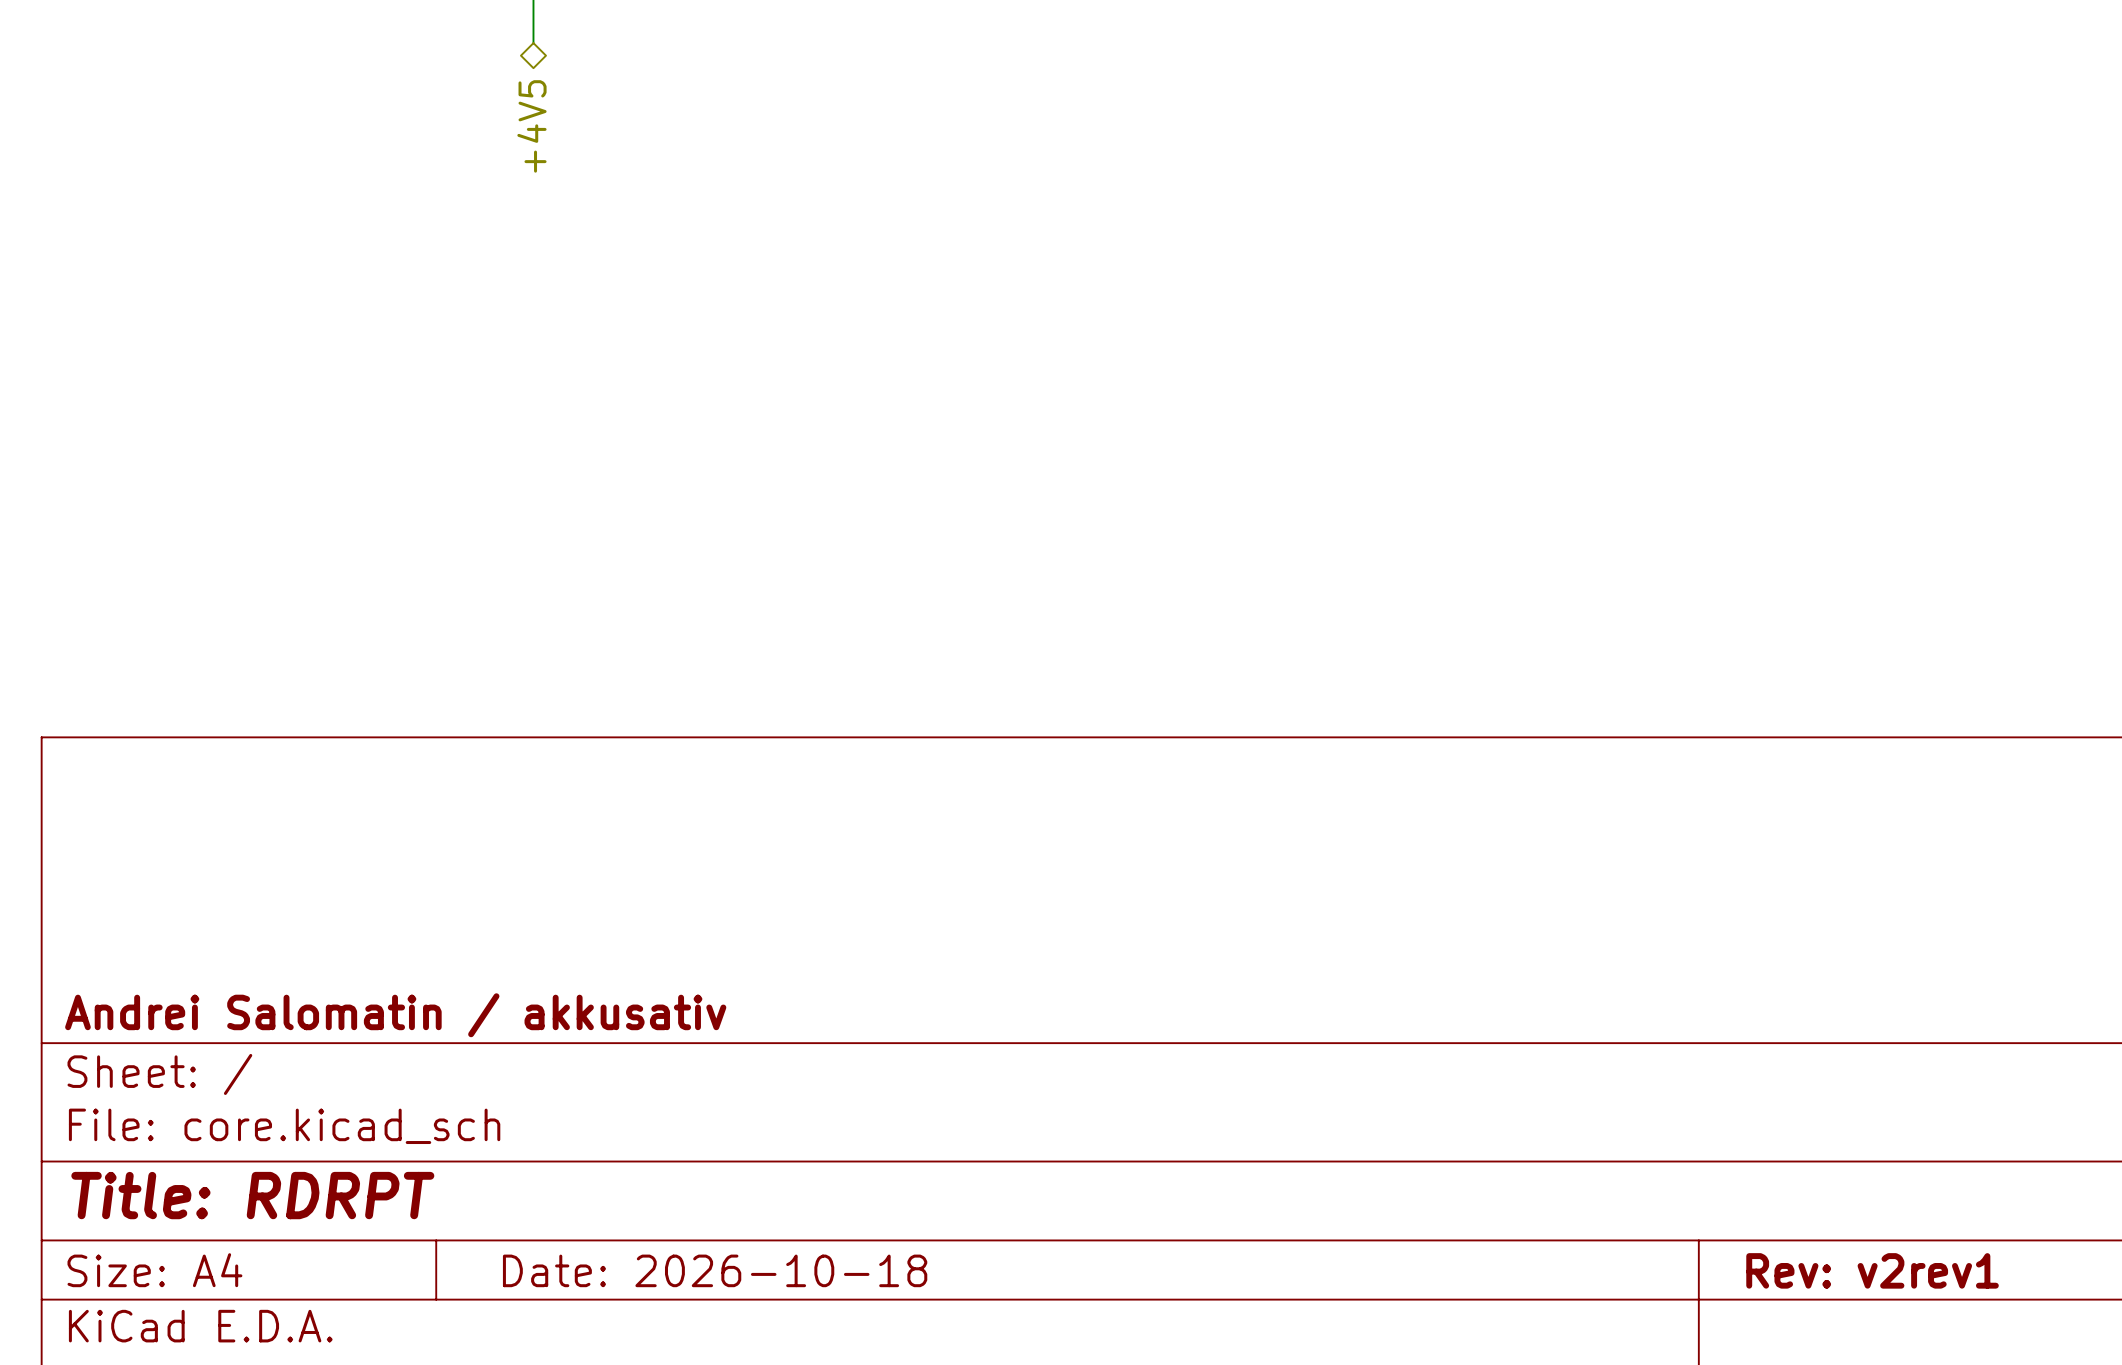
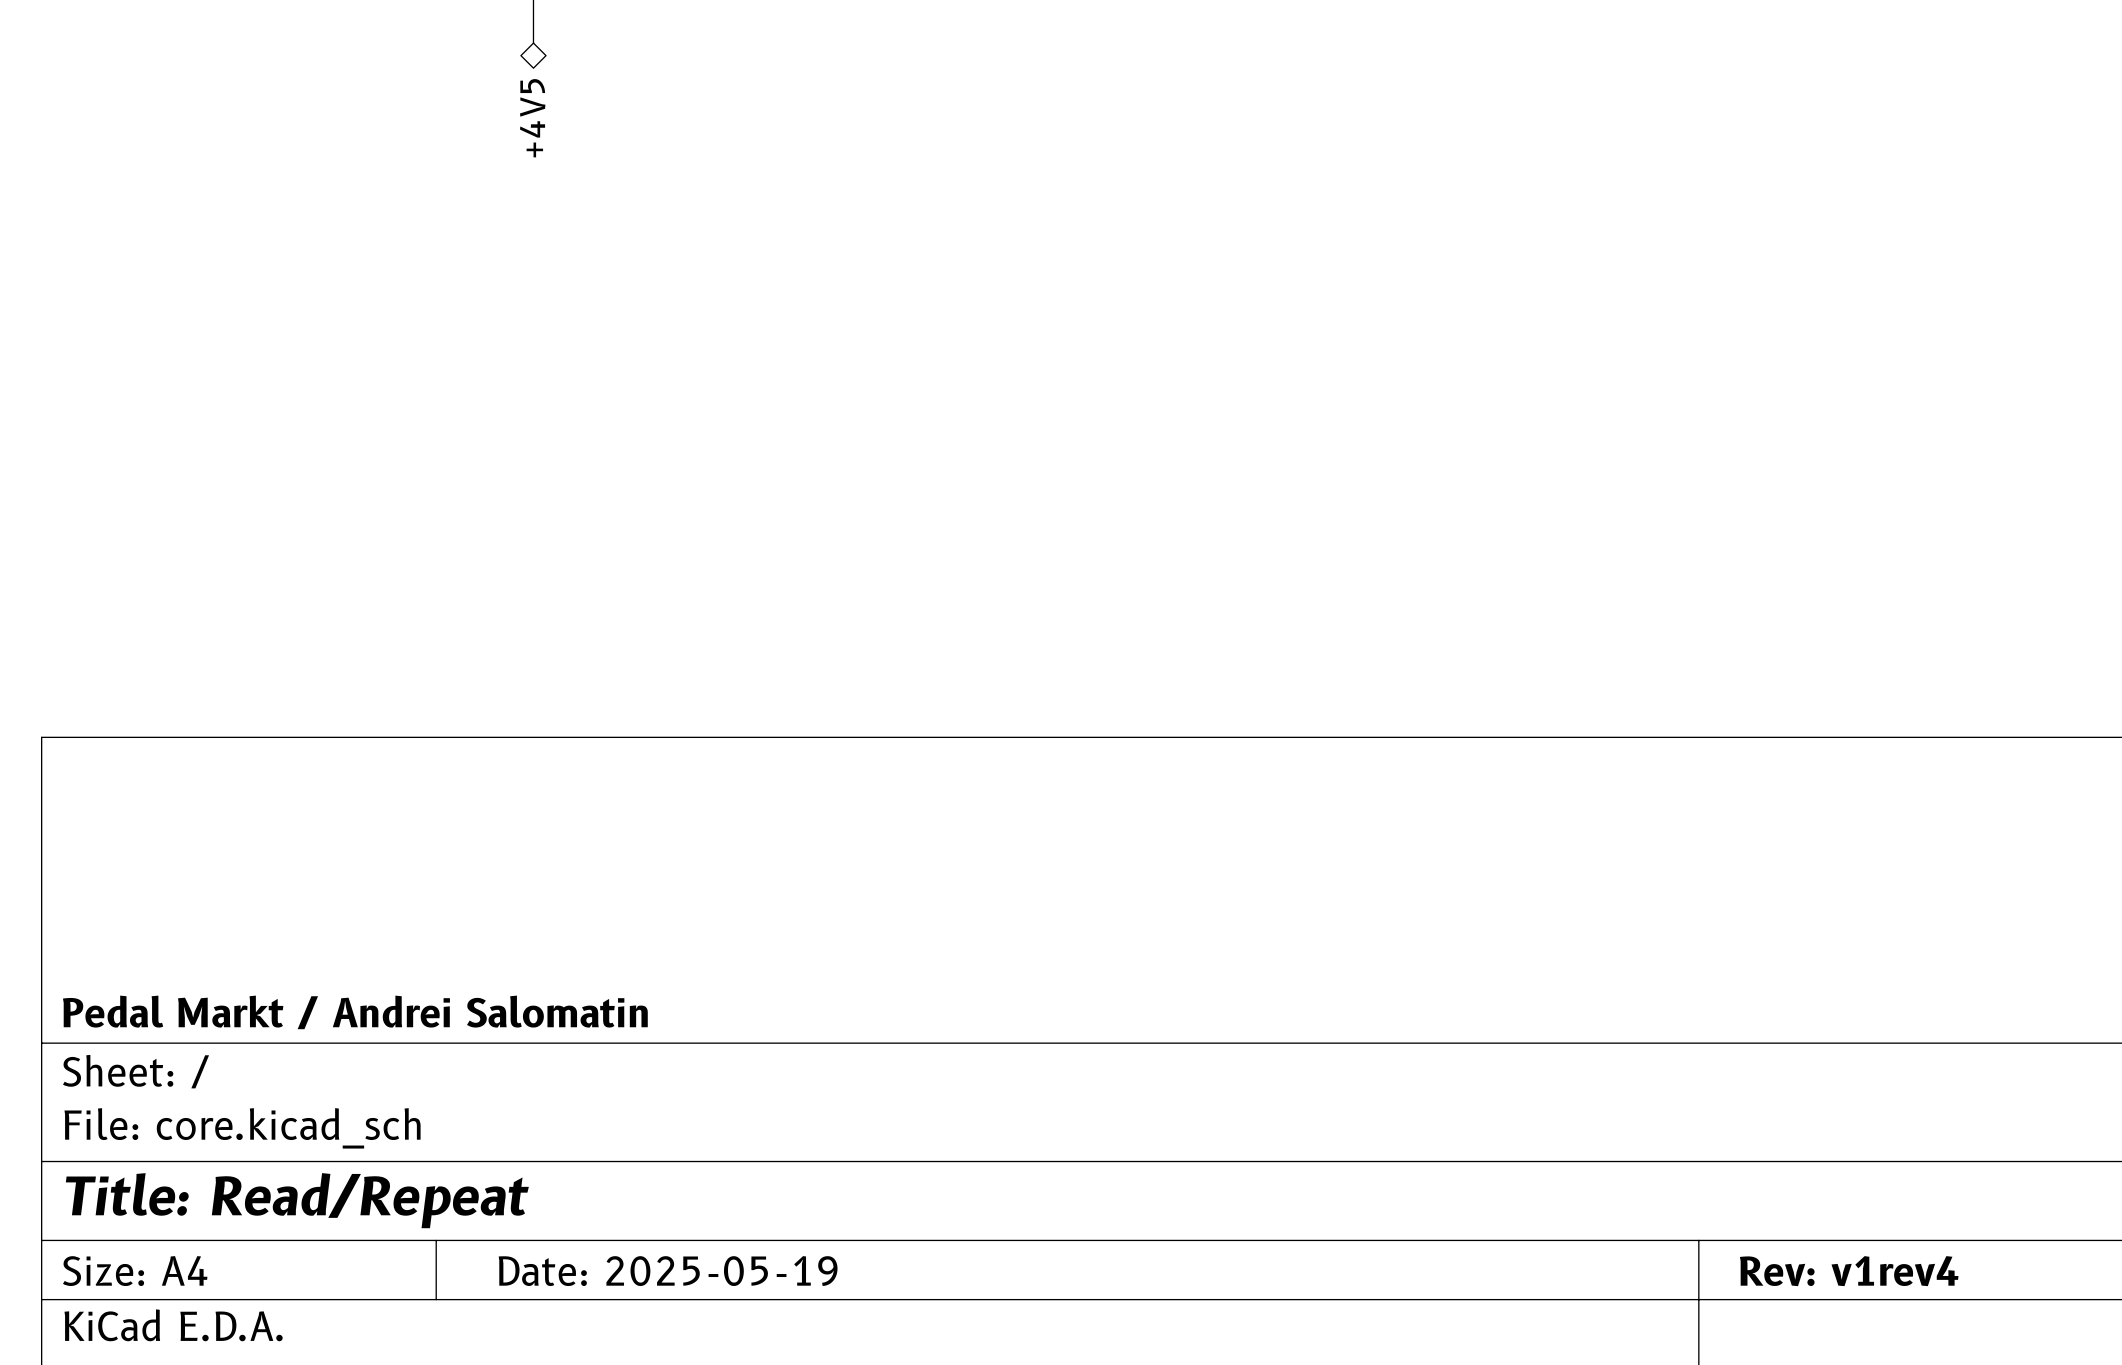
title block: Andrei Salomatin / akkusativ (395, 1015) -> Pedal Markt / Andrei Salomatin (355, 1012)
title block: Title: RDRPT (252, 1195) -> Title: Read/Repeat (297, 1200)
title block: Date: 2026-10-18 (715, 1270) -> Date: 2025-05-19 (668, 1271)
title block: Rev: v2rev1 (1872, 1270) -> Rev: v1rev4 (1849, 1271)

